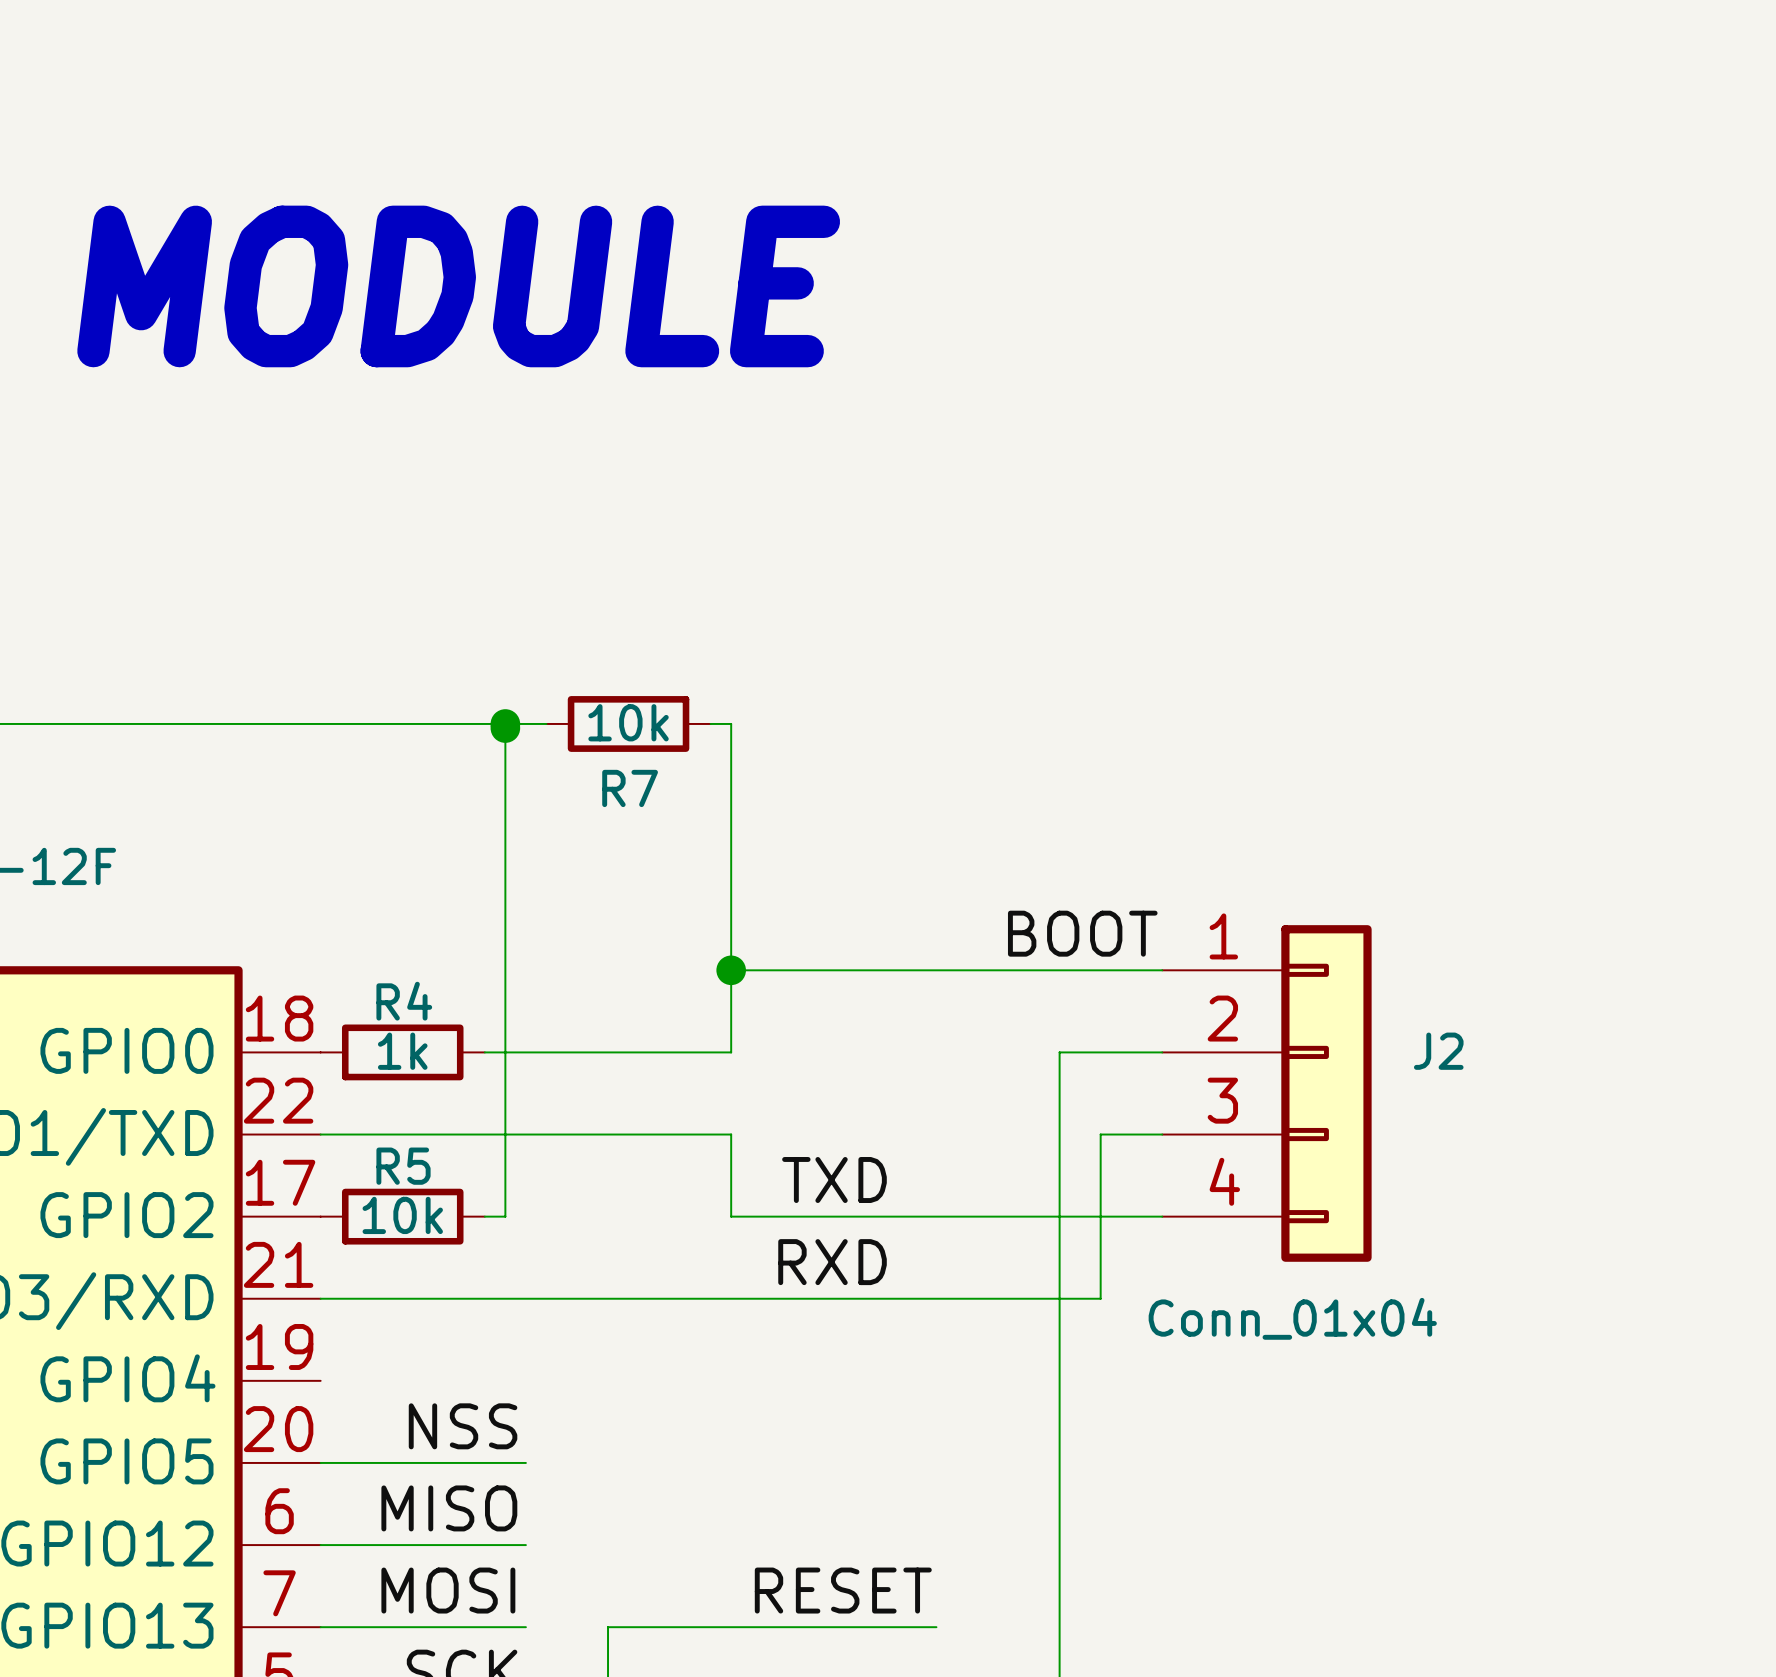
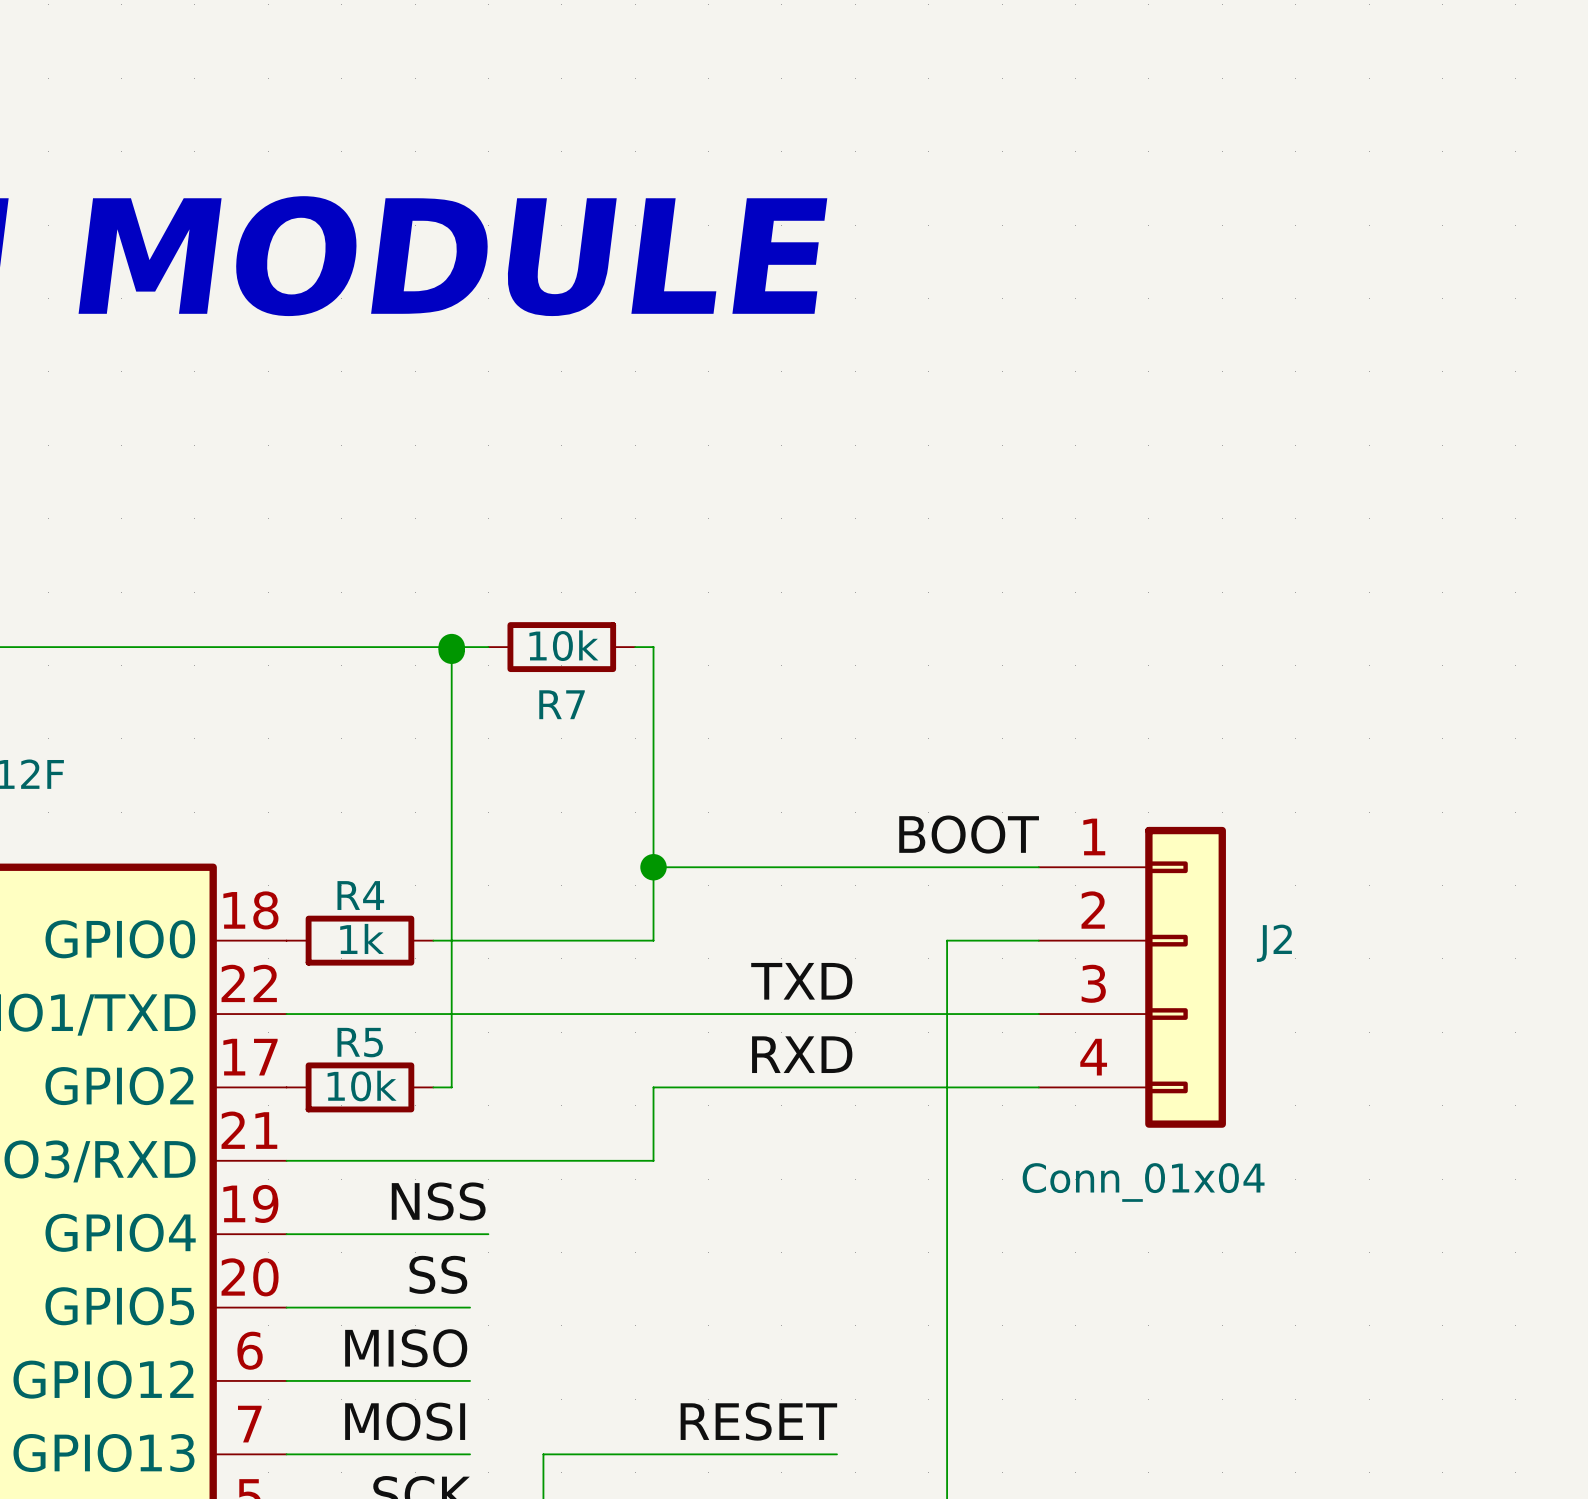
wire: (731, 1134) (731, 1216) -> (653, 1160) (653, 1087)
wire: (1100, 1134) (1100, 1298) (731, 1298) -> (983, 1014) (653, 1014)
label position: TXD (834, 1180) -> TXD (801, 981)
label position: RXD (832, 1262) -> RXD (802, 1054)
label: none -> NSS (438, 1201)
wire: none -> (286, 1234) (488, 1234)
label: NSS (463, 1426) -> SS (438, 1274)

